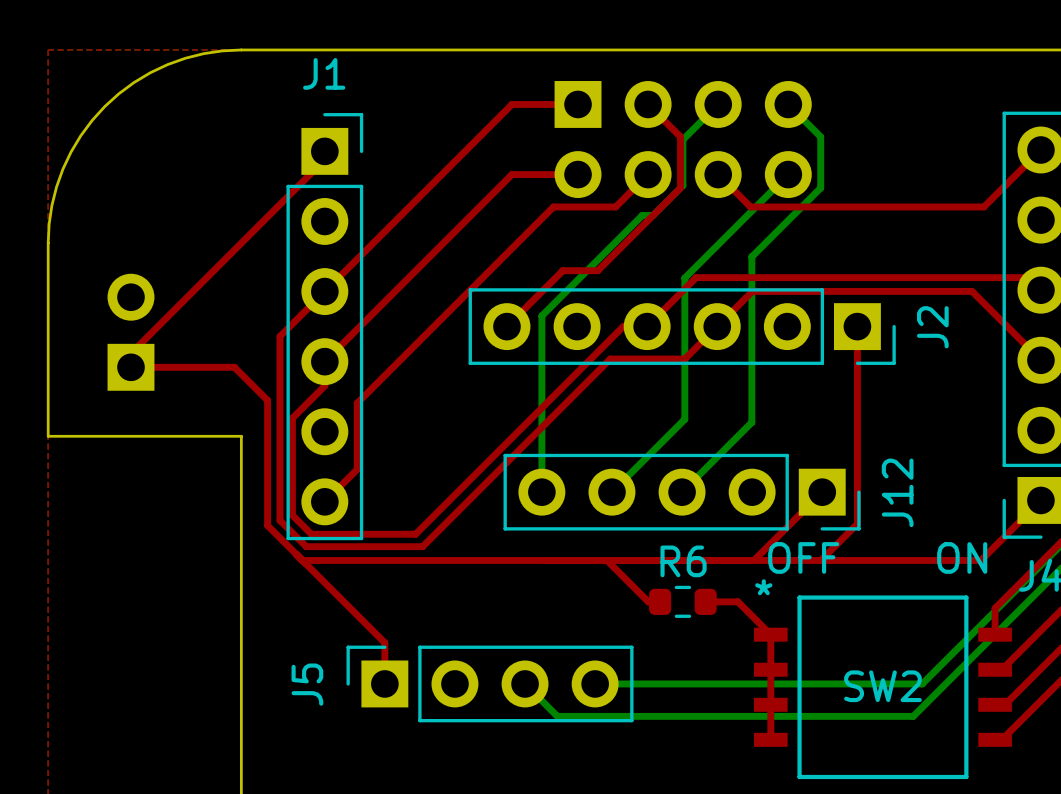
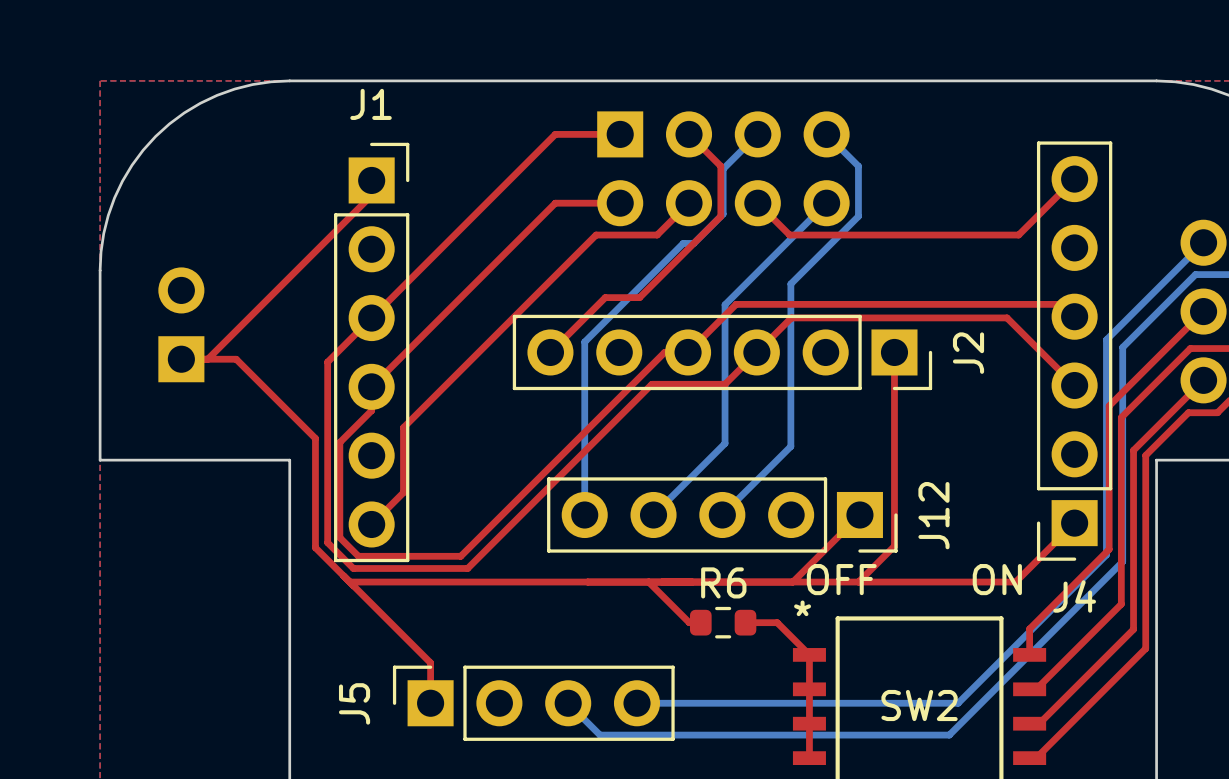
top track: (324, 159) (130, 353) (130, 367) (234, 367) (267, 400) (267, 414) -> (371, 188) (371, 195) (207, 359)
part position: (130, 332) -> (181, 324)
top track: none -> (181, 359) (236, 359) (315, 438)

